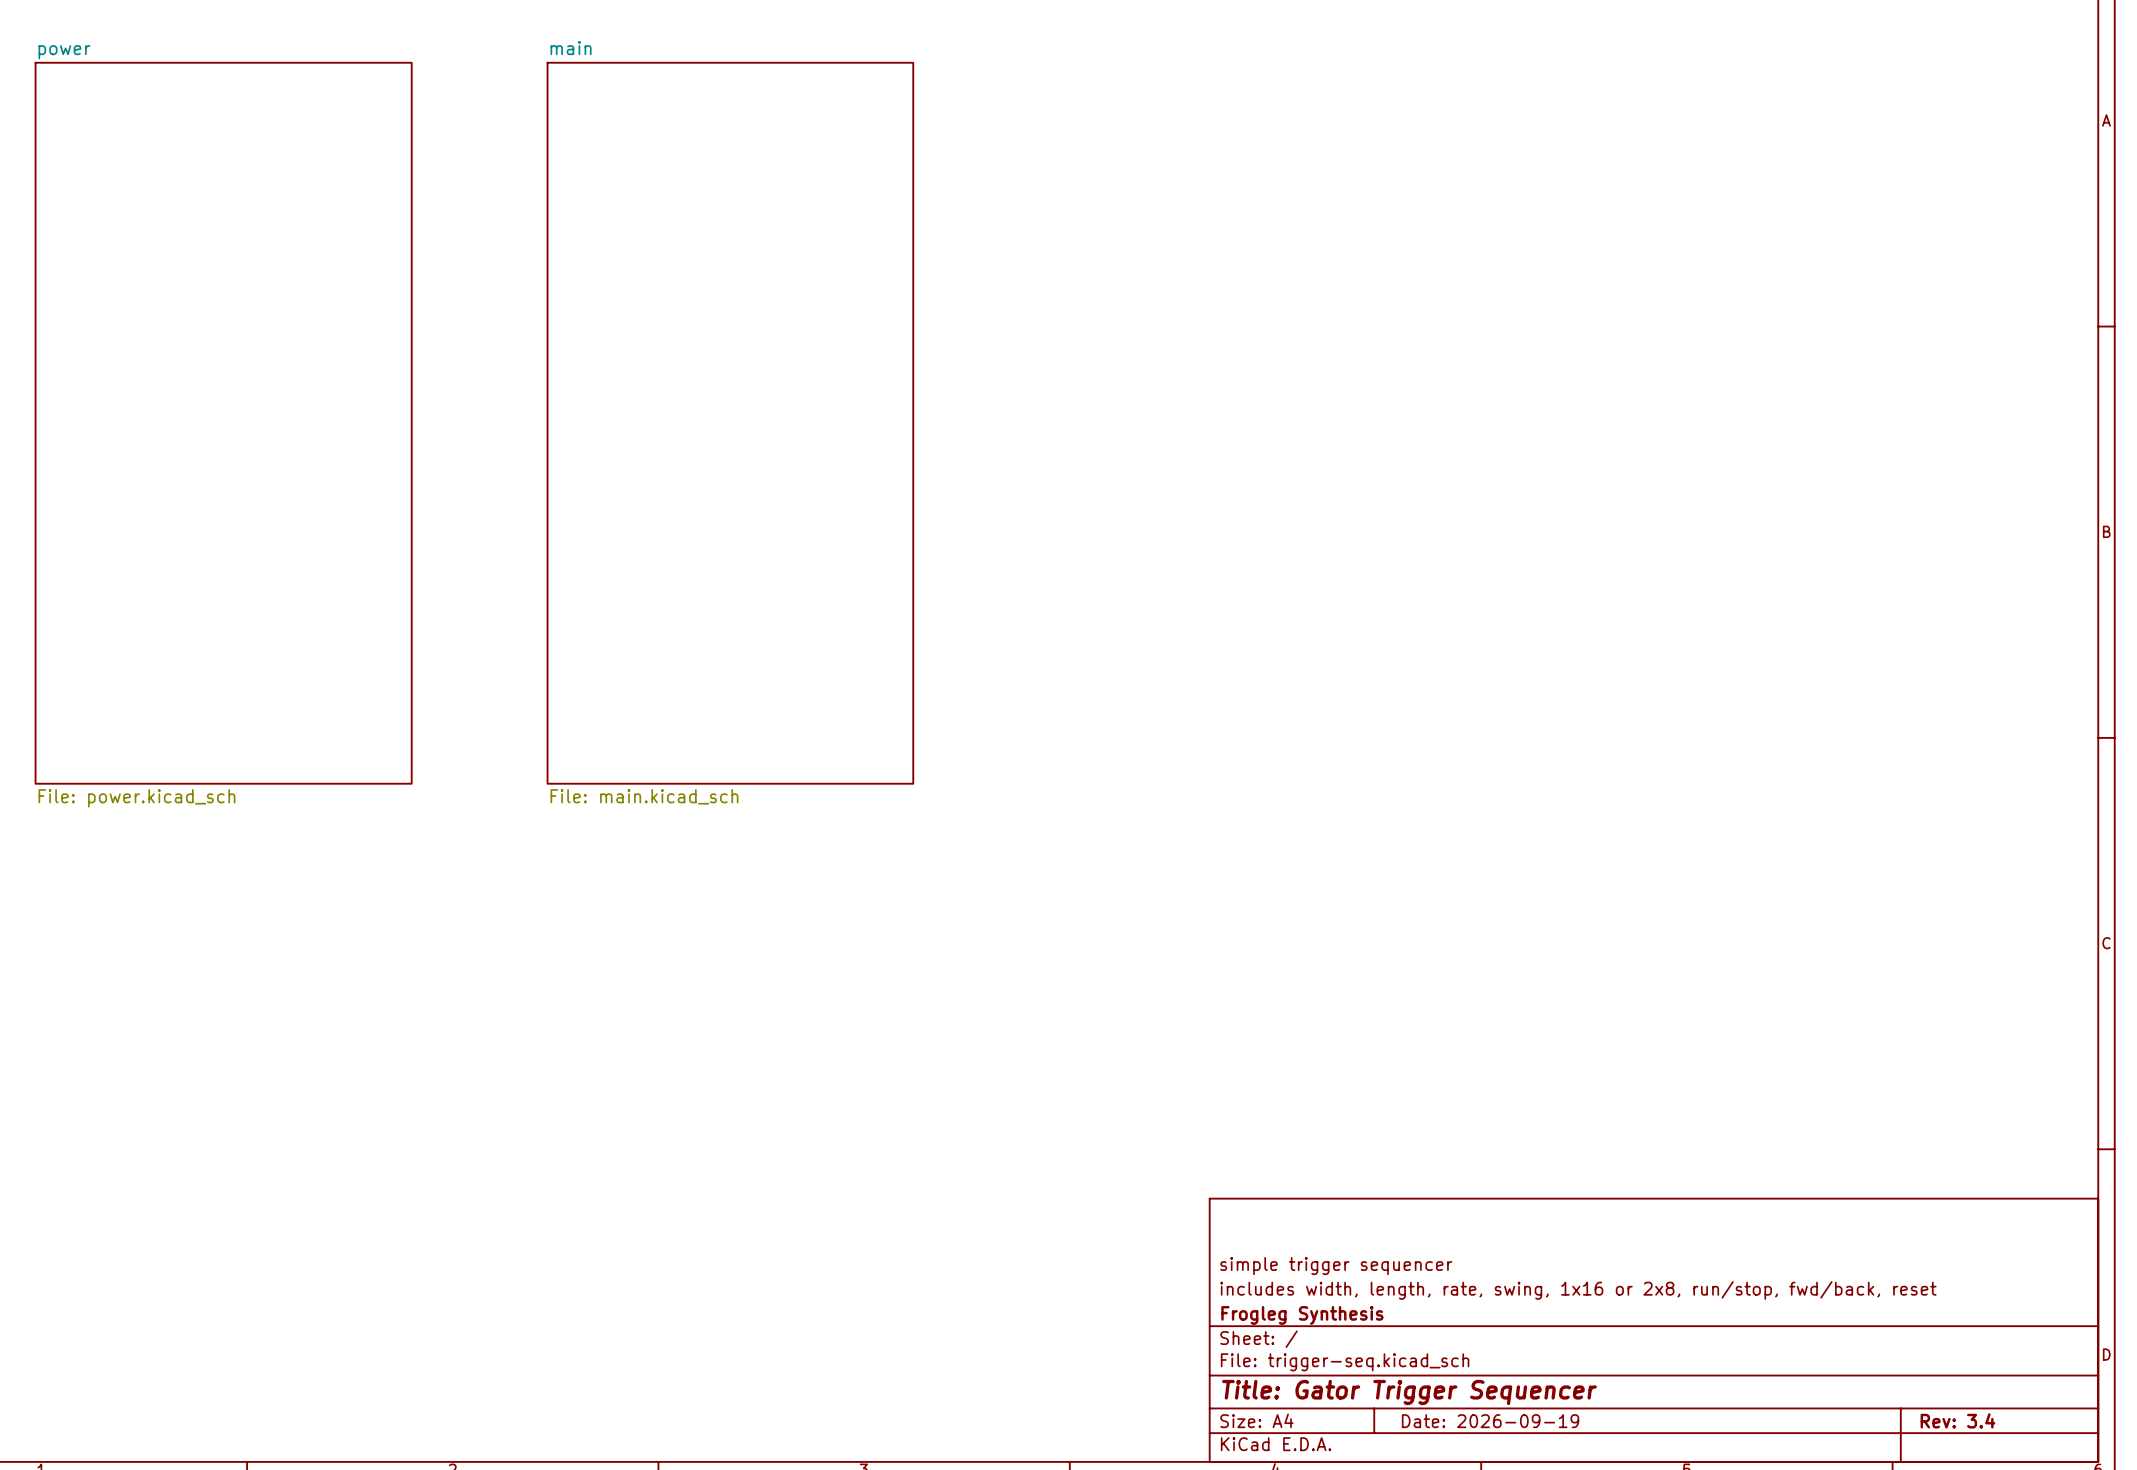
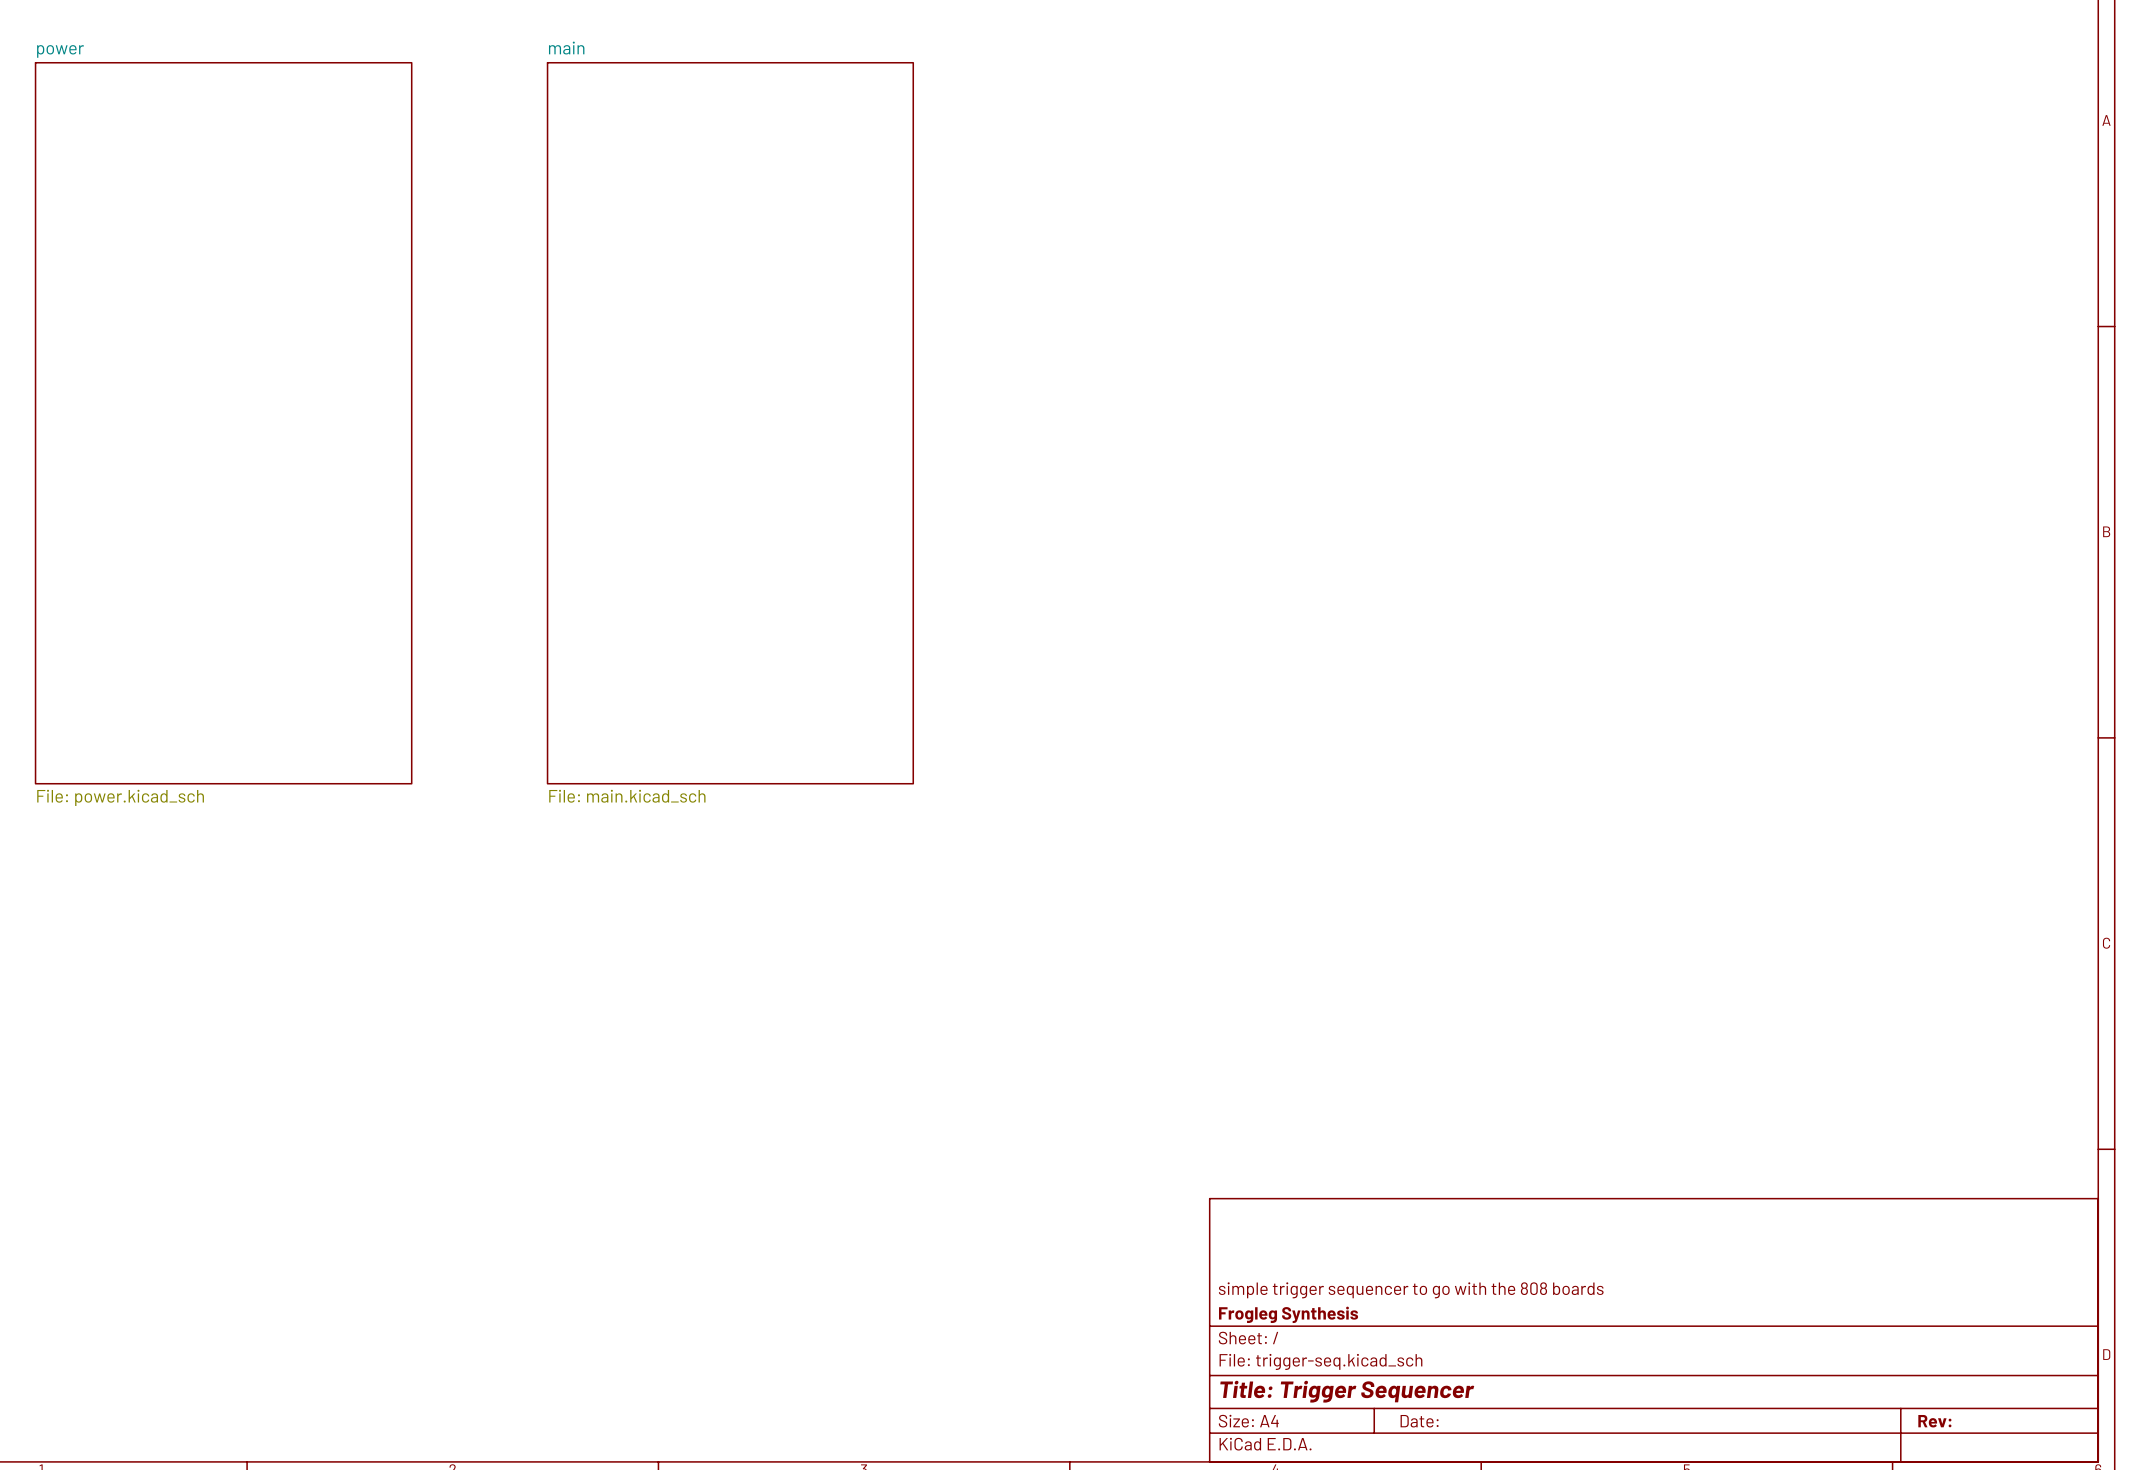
title block: simple trigger sequencer (1336, 1266) -> none
title block: includes width, length, rate, swing, 1x16 or 2x8, run/stop, fwd/back, reset (1578, 1290) -> simple trigger sequencer to go with the 808 boards (1411, 1290)
title block: Title: Gator Trigger Sequencer (1409, 1392) -> Title: Trigger Sequencer (1347, 1391)
title block: Rev: 3.4 (1957, 1420) -> Rev: (1934, 1421)
title block: Date: 2026-09-19 (1490, 1421) -> Date: (1419, 1421)

